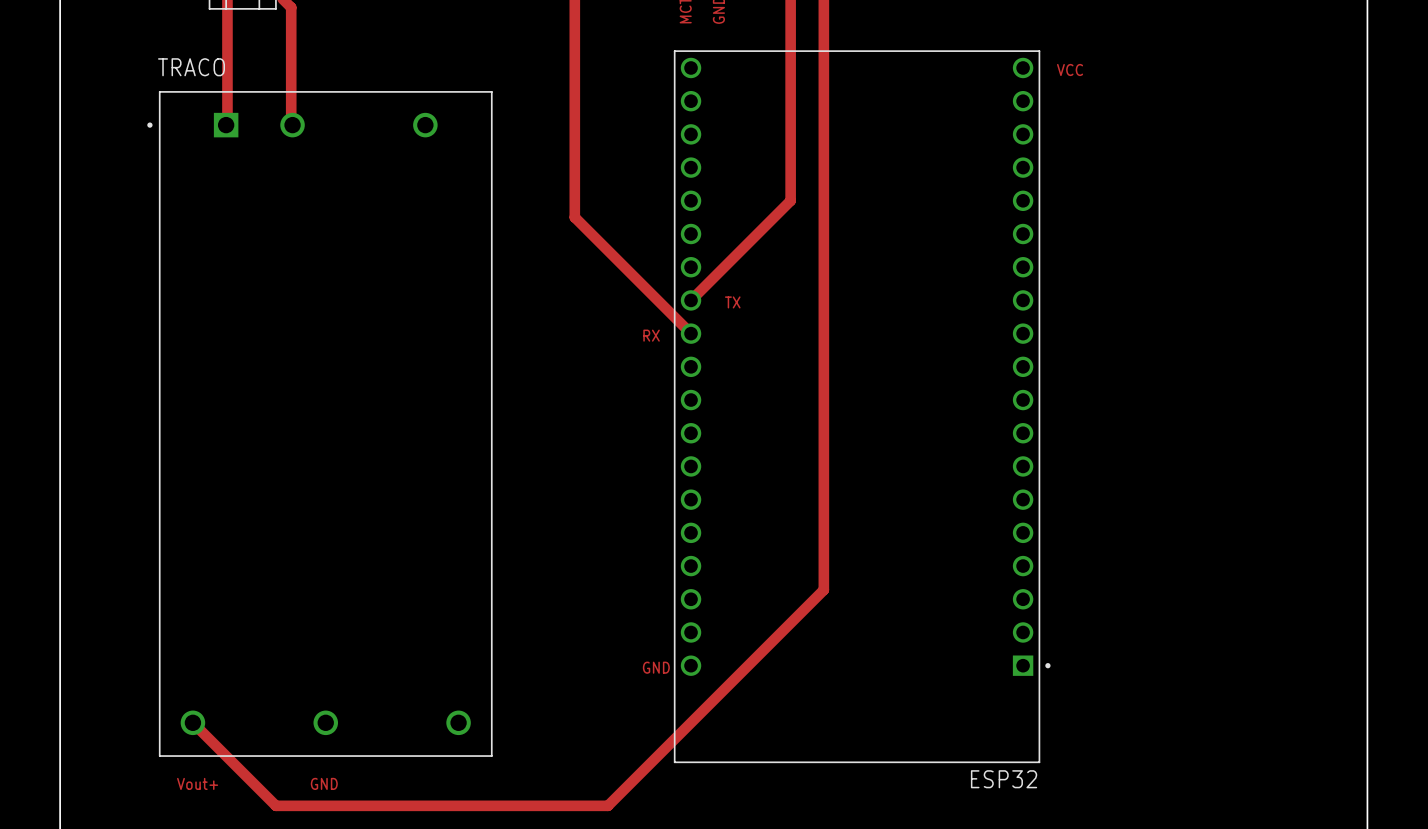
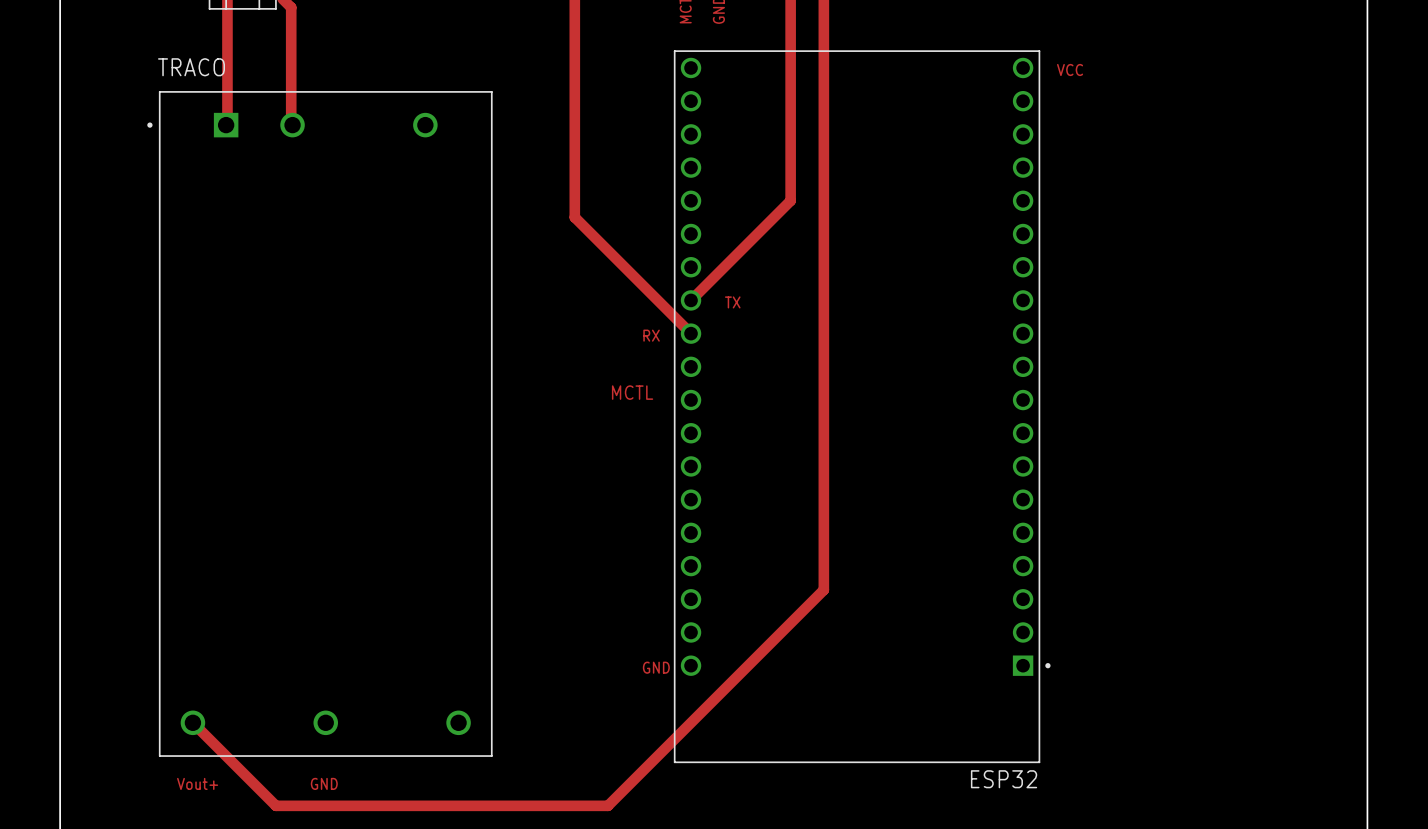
text: none -> MCTL (632, 392)

